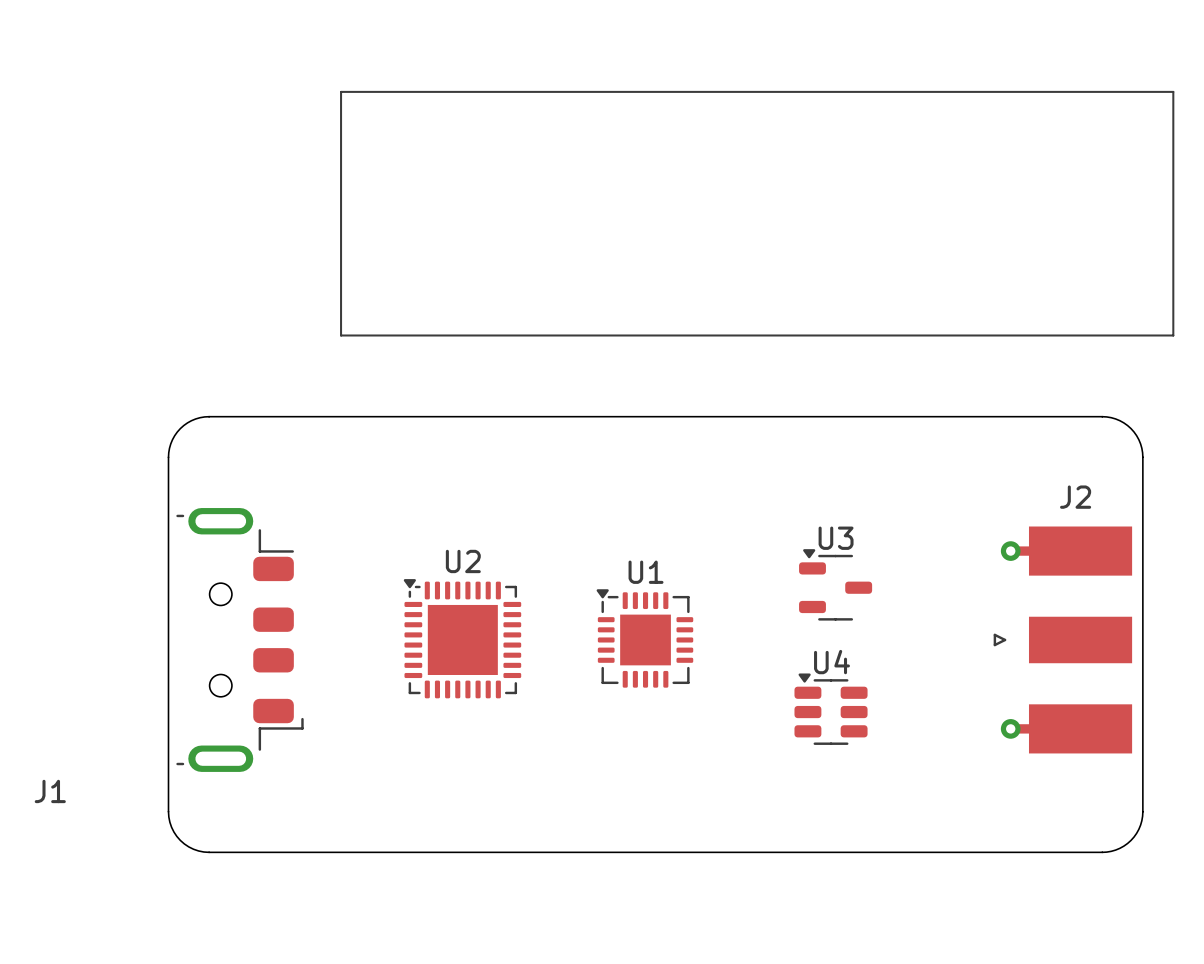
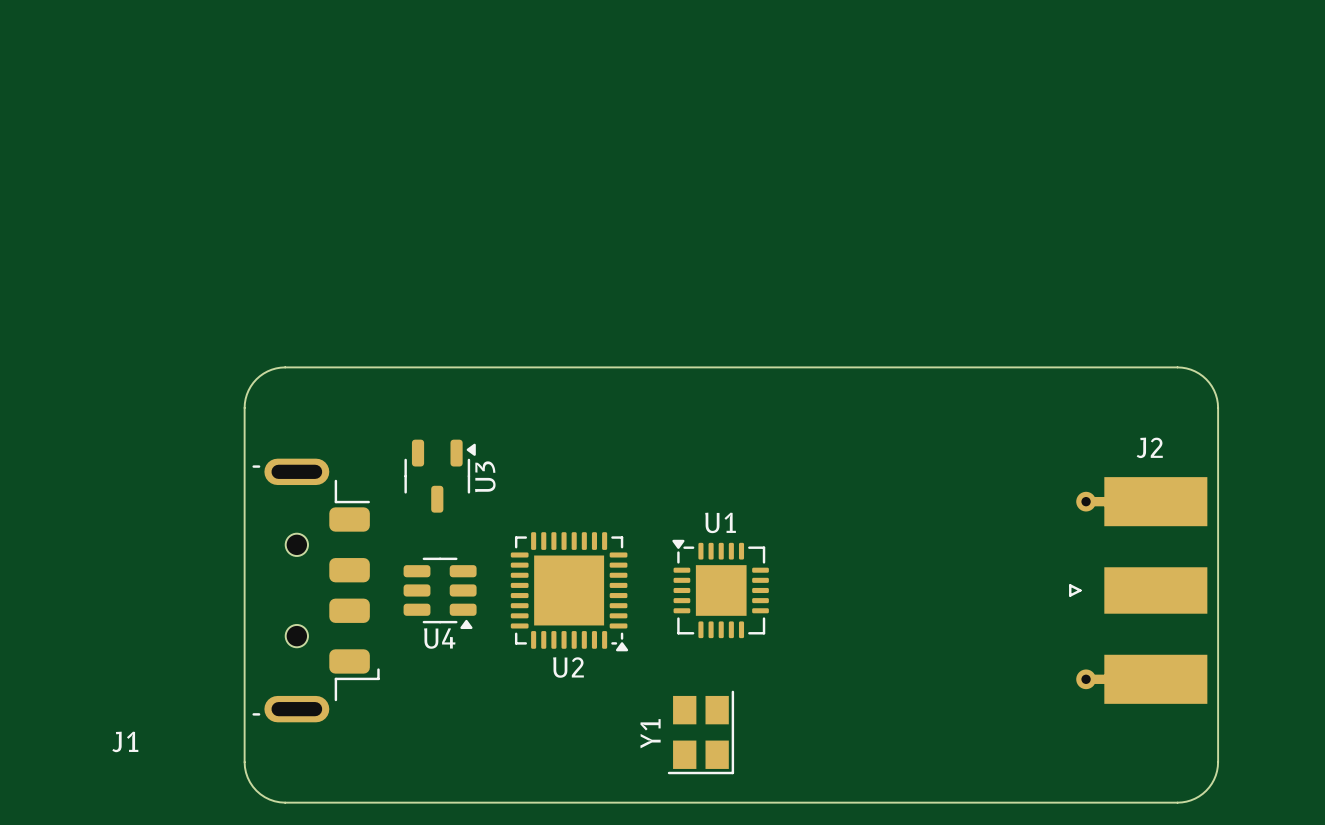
line: (341, 91) (1173, 91) (1173, 335) (341, 335) (341, 91) -> none
U3 rotation: 0° (835, 584) -> 90° clockwise (440, 476)
U3 position: (835, 584) -> (440, 476)
U2 rotation: 0° (462, 638) -> 180° (569, 591)
U4 rotation: 0° (831, 709) -> 180° (440, 593)
U4 position: (831, 709) -> (440, 593)
Y1: none -> (700, 732)

